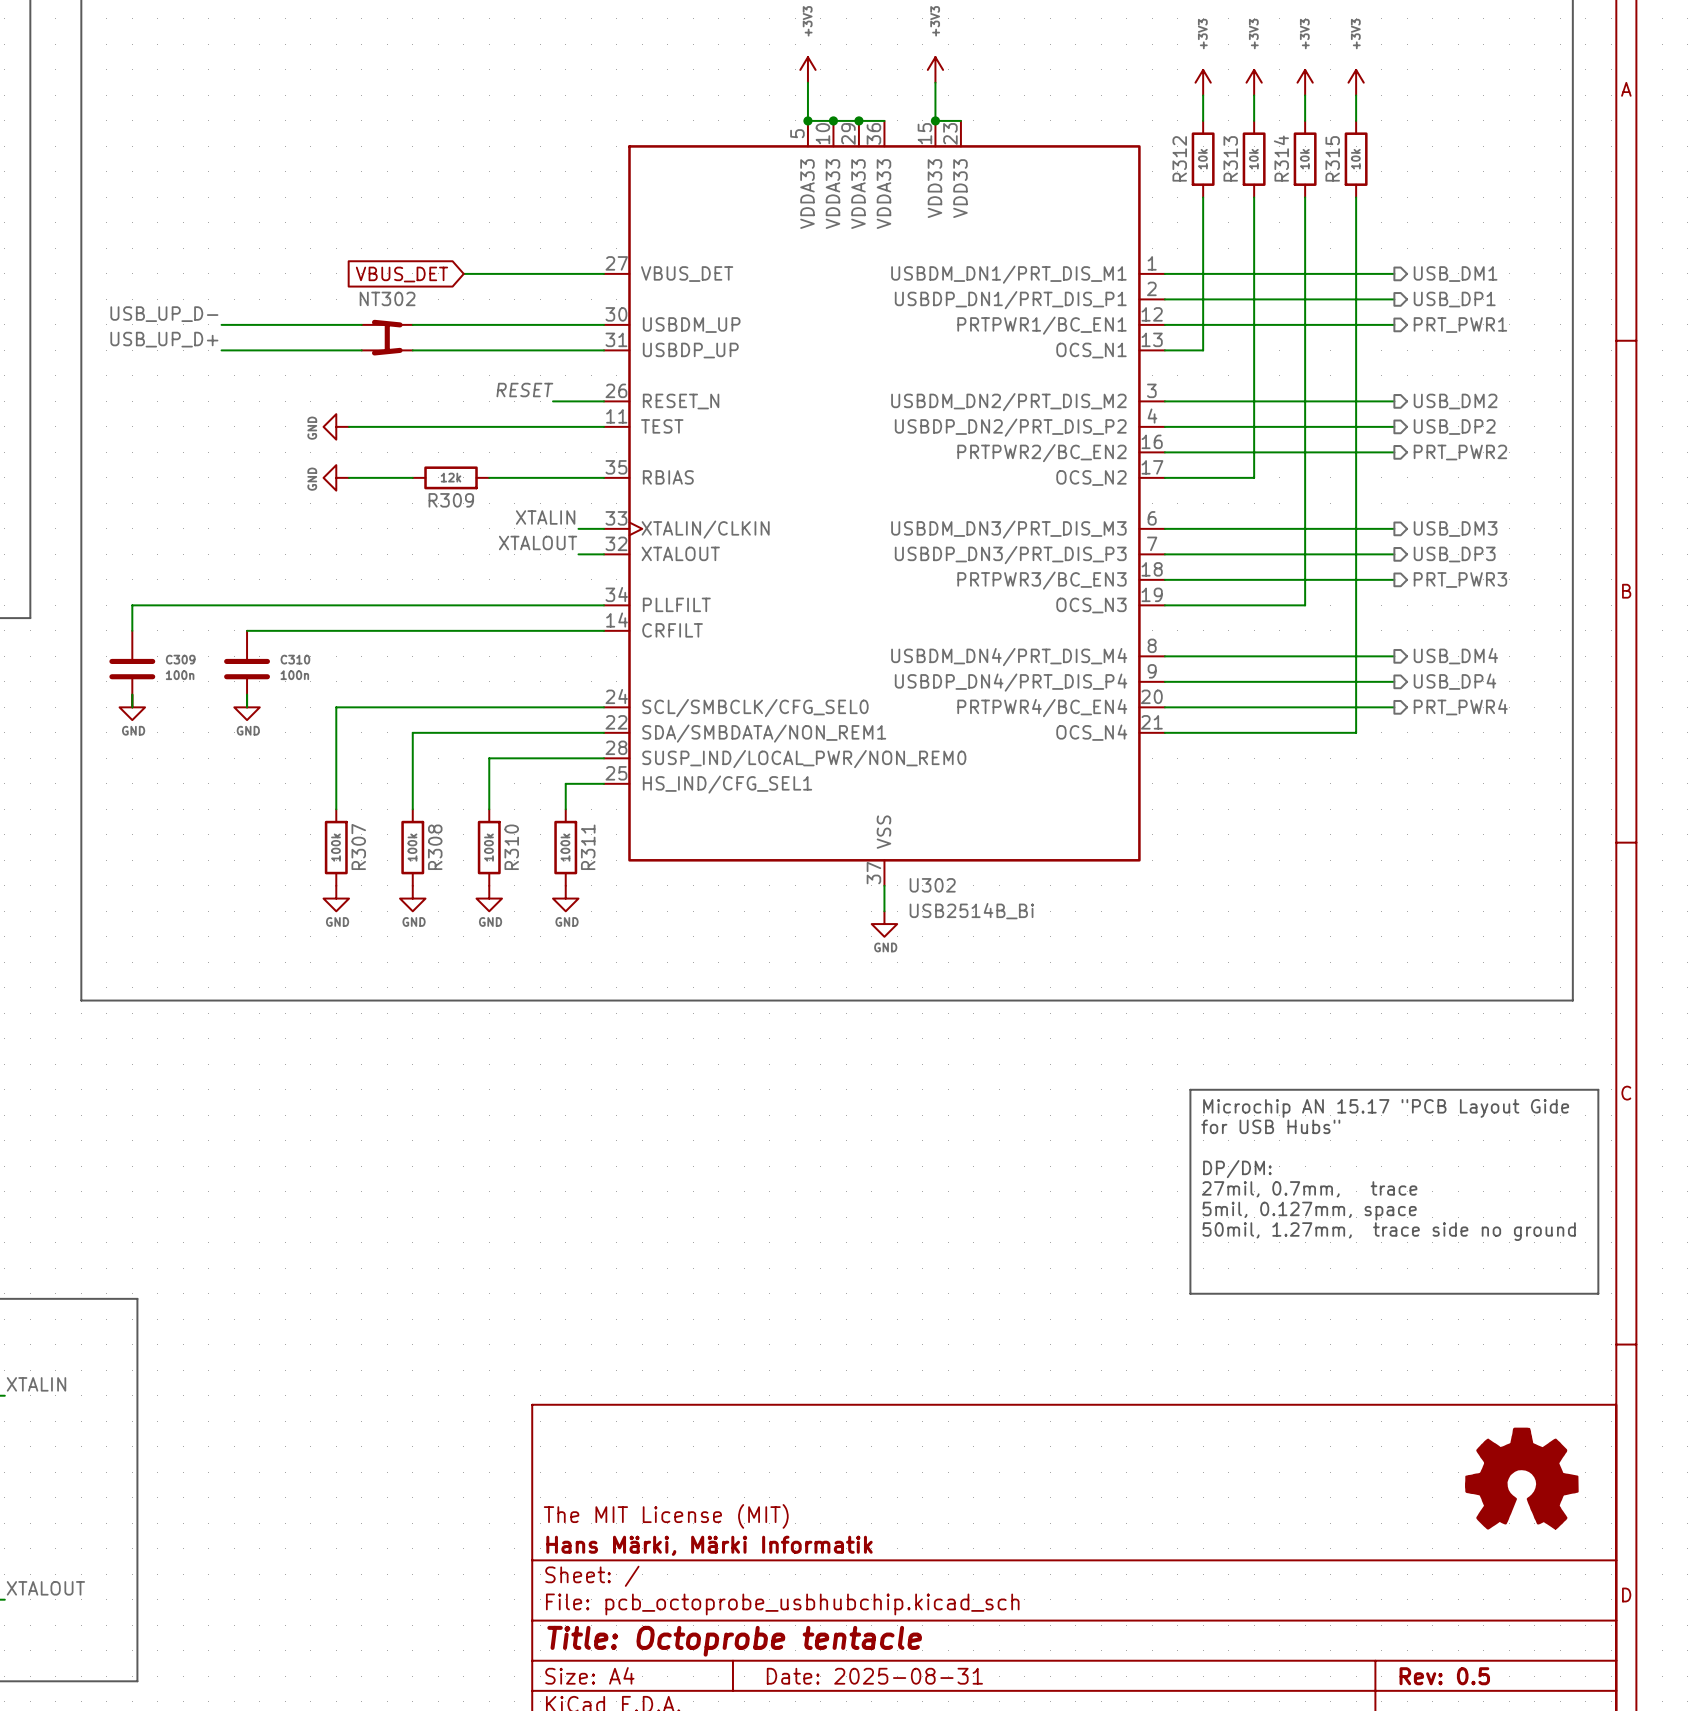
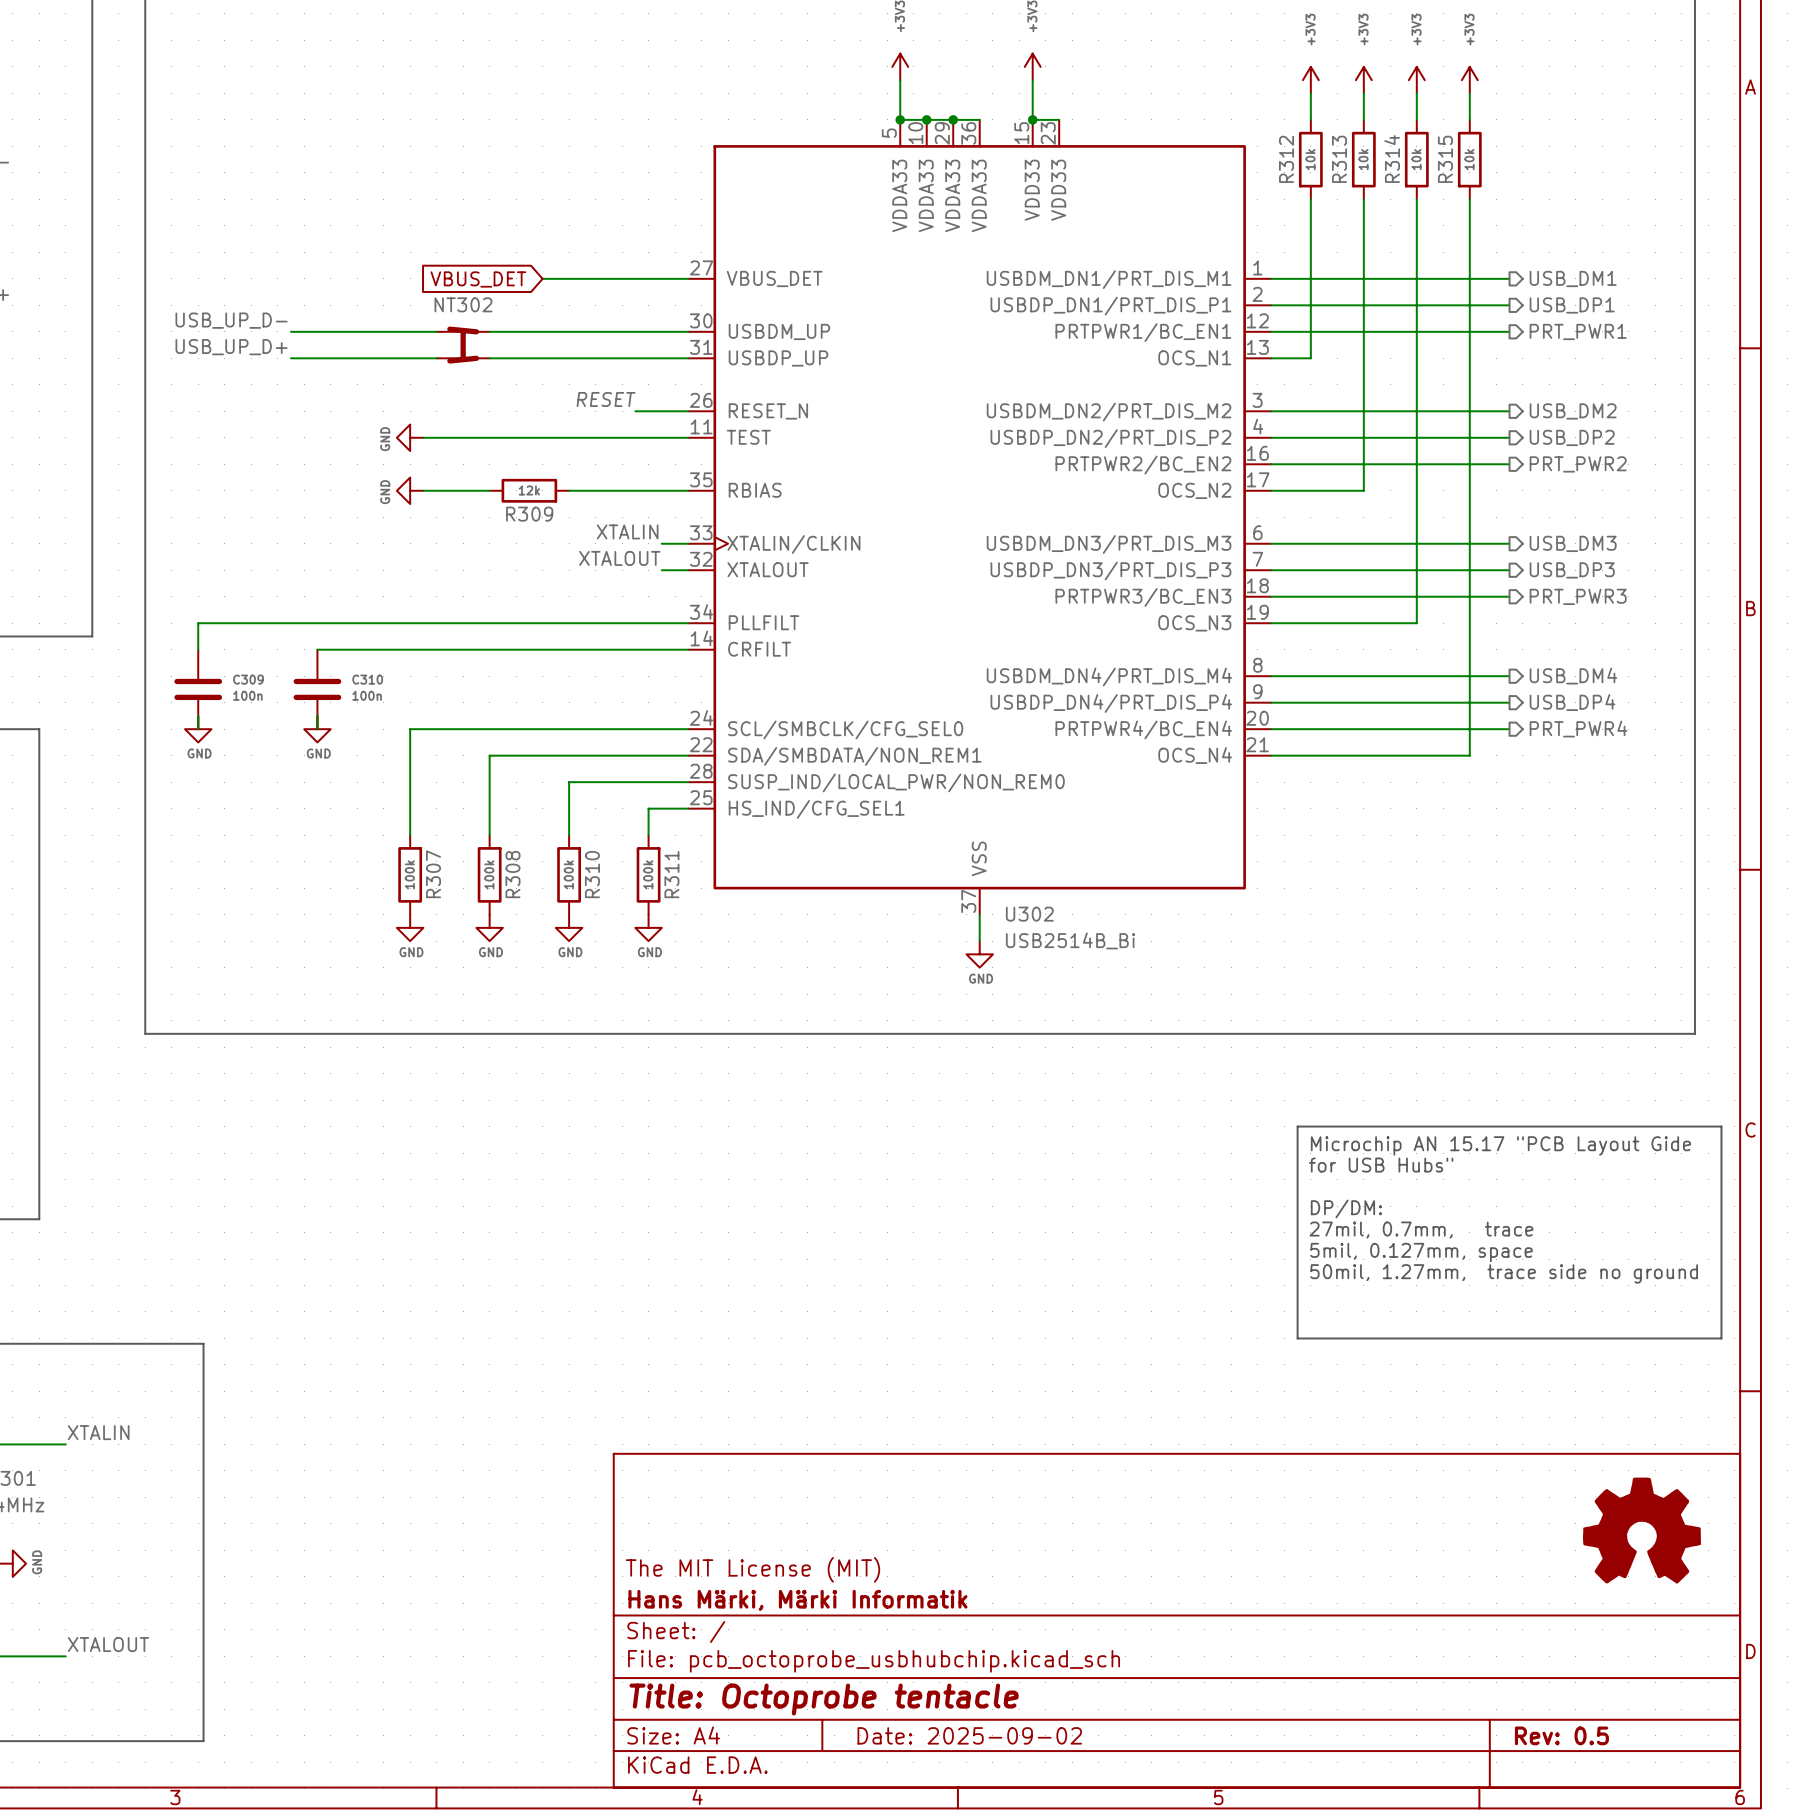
title block: Date: 2025-08-31 (874, 1676) -> Date: 2025-09-02 (969, 1735)

